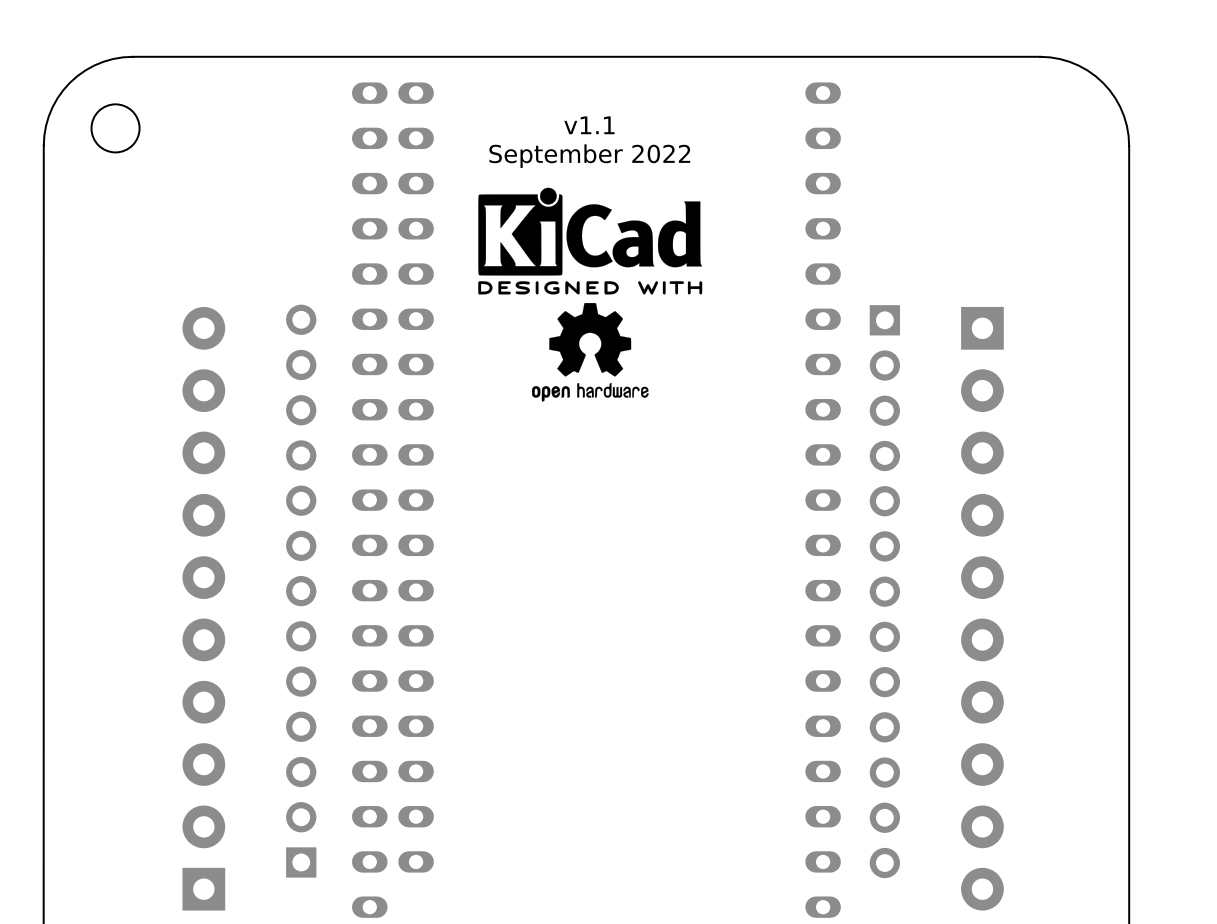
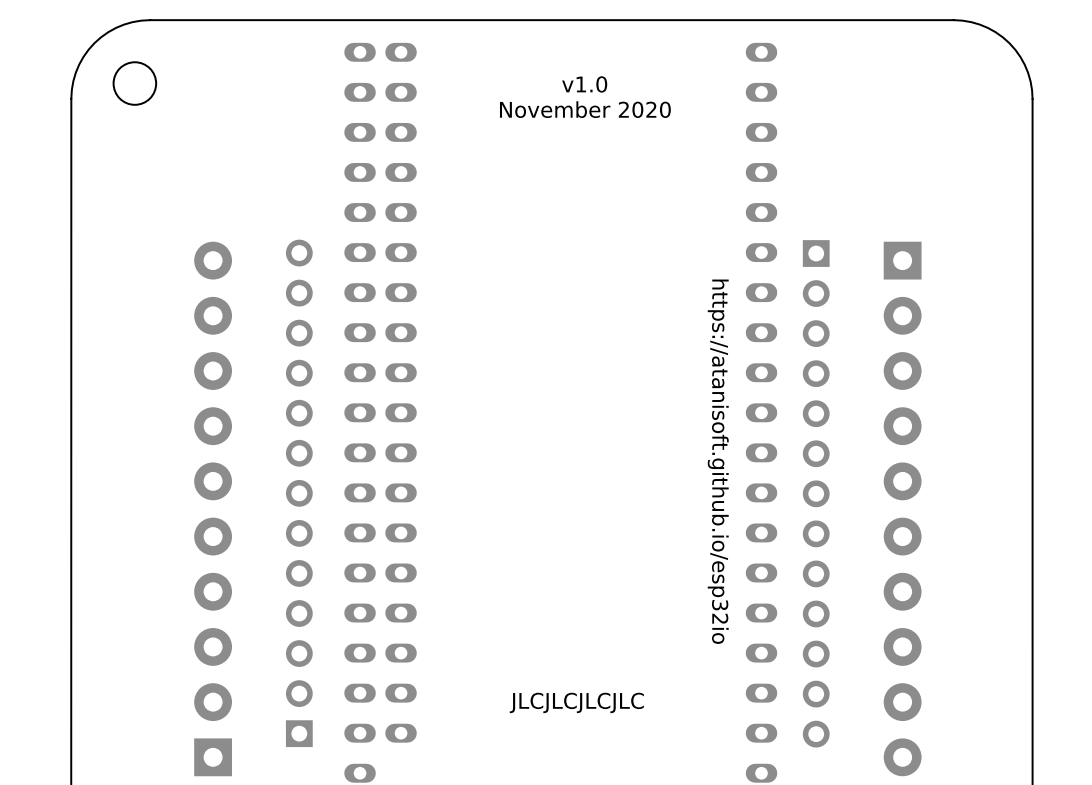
text: v1.1 (589, 125) -> v1.0 (584, 84)
text: September 2022 (589, 156) -> November 2020 (585, 109)
drawing: [478, 187, 703, 402] -> none
text: none -> https://atanisoft.github.io/esp32io (718, 461)
text: none -> JLCJLCJLCJLC (576, 702)

